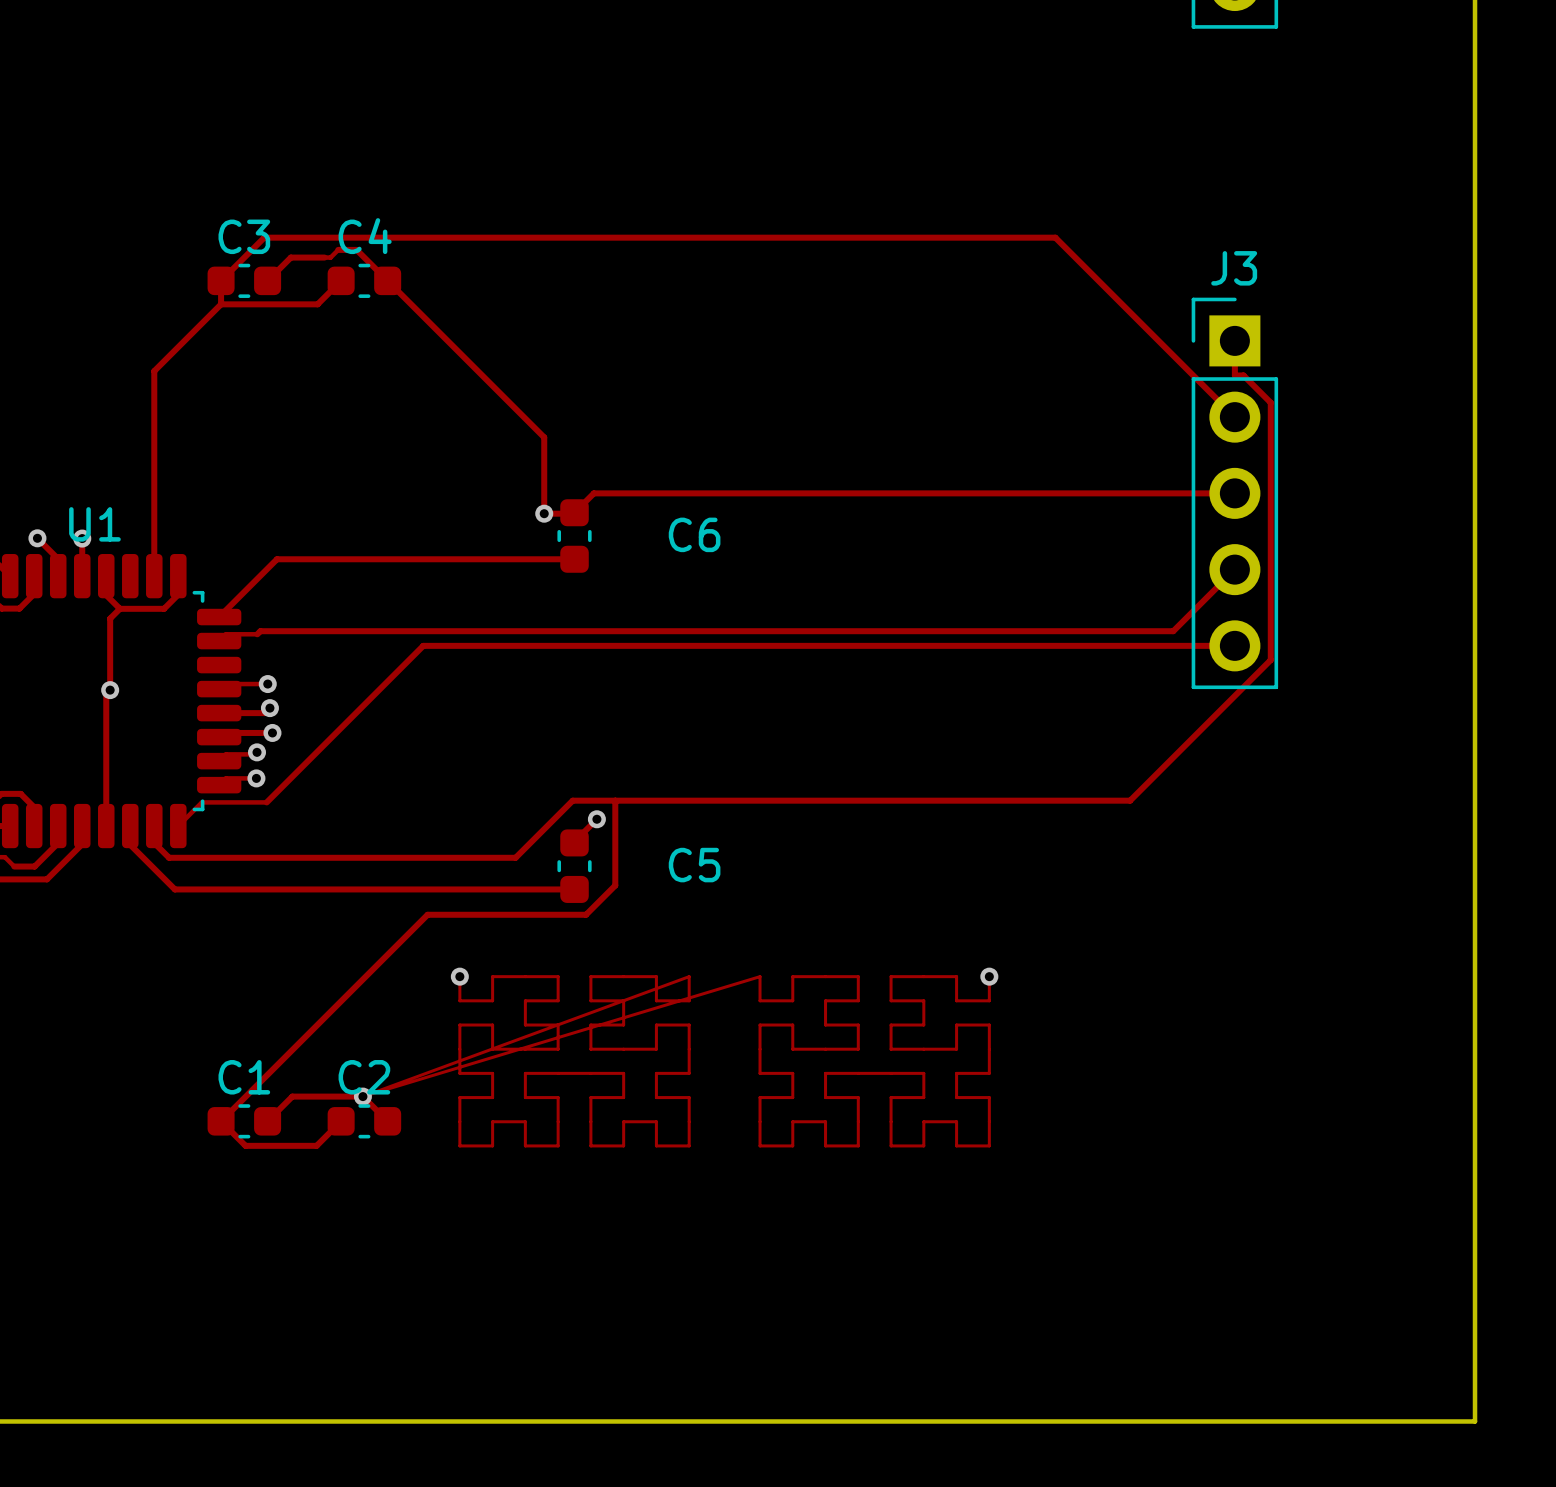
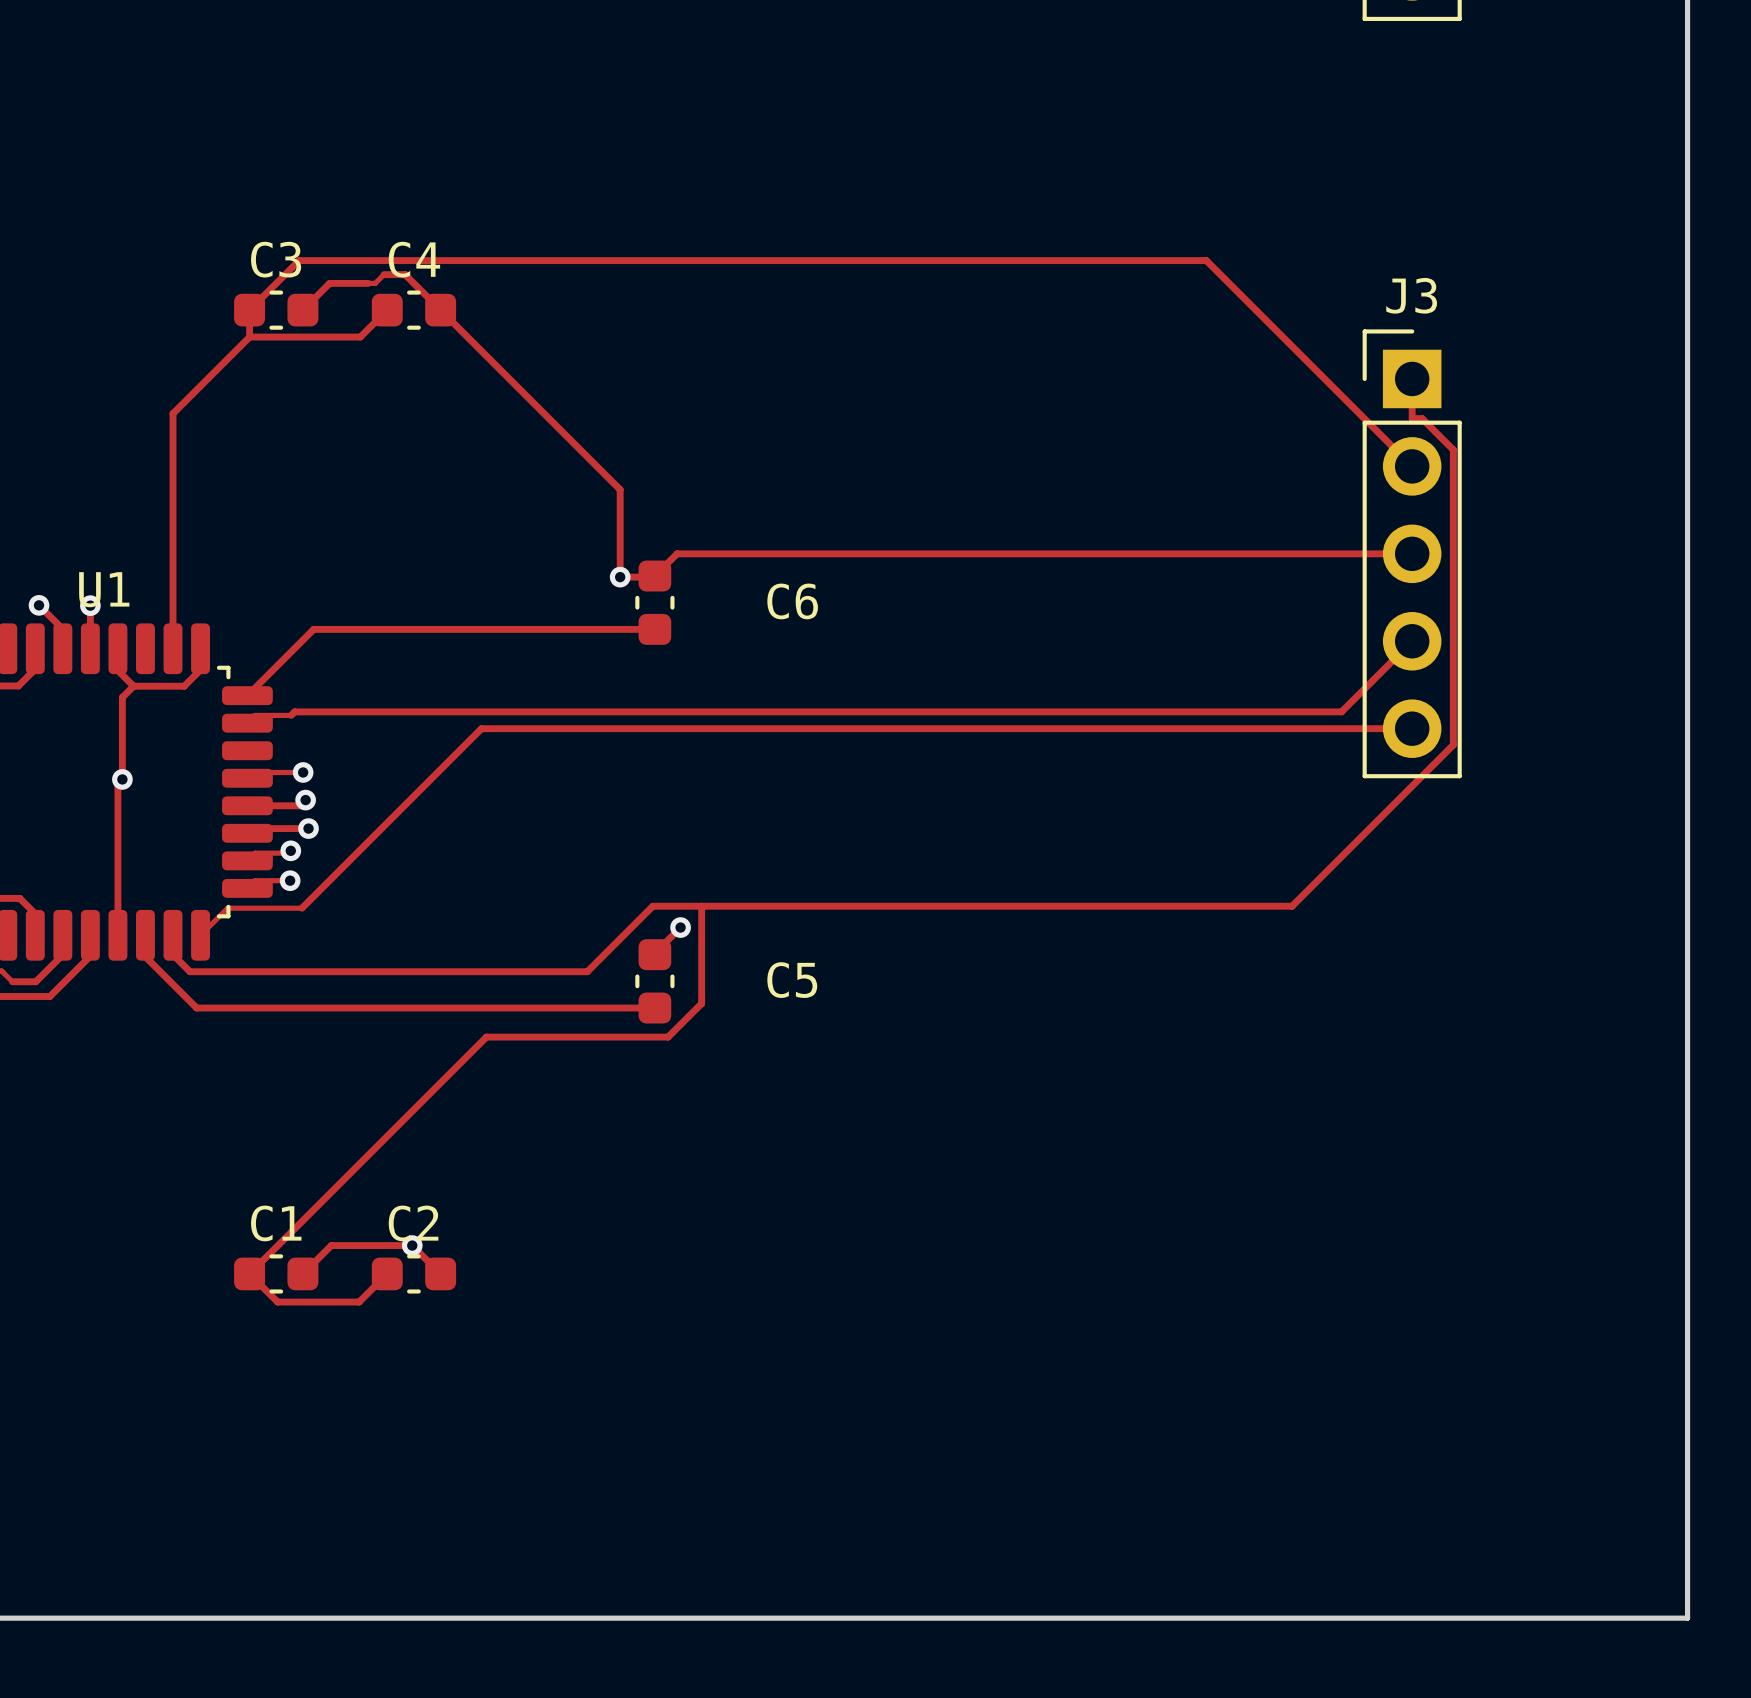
track: (459, 976) (459, 1000) (492, 1000) (492, 976) (558, 976) (558, 1000) (525, 1000) (525, 1025) (558, 1025) (558, 1049) (492, 1049) (492, 1025) (459, 1025) (459, 1073) (492, 1073) (492, 1097) (459, 1097) (459, 1145) (492, 1145) (492, 1121) (525, 1121) (525, 1145) (558, 1145) (558, 1097) (525, 1097) (525, 1073) (623, 1073) (623, 1097) (590, 1097) (590, 1145) (623, 1145) (623, 1121) (656, 1121) (656, 1145) (689, 1145) (689, 1097) (656, 1097) (656, 1073) (689, 1073) (689, 1025) (656, 1025) (656, 1049) (590, 1049) (590, 1025) (623, 1025) (623, 1000) (590, 1000) (590, 976) (656, 976) (656, 1000) (689, 1000) (689, 976) (362, 1096) (760, 976) (760, 1000) (792, 1000) (792, 976) (858, 976) (858, 1000) (825, 1000) (825, 1025) (858, 1025) (858, 1049) (792, 1049) (792, 1025) (760, 1025) (760, 1073) (792, 1073) (792, 1097) (760, 1097) (760, 1145) (792, 1145) (792, 1121) (825, 1121) (825, 1145) (858, 1145) (858, 1097) (825, 1097) (825, 1073) (923, 1073) (923, 1097) (891, 1097) (891, 1145) (923, 1145) (923, 1121) (956, 1121) (956, 1145) (989, 1145) (989, 1097) (956, 1097) (956, 1073) (989, 1073) (989, 1025) (956, 1025) (956, 1049) (891, 1049) (891, 1025) (923, 1025) (923, 1000) (891, 1000) (891, 976) (956, 976) (956, 1000) (989, 1000) (989, 976) -> none
via: (459, 976) -> none
via: (989, 976) -> none

